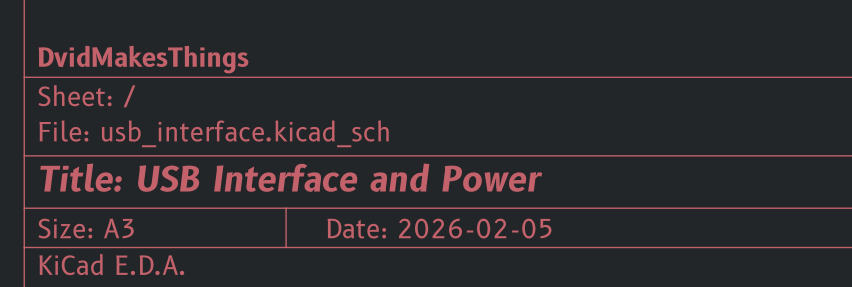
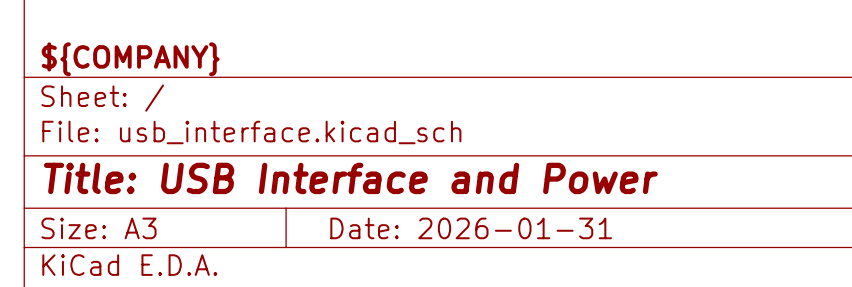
title block: DvidMakesThings (143, 59) -> ${COMPANY} (130, 59)
title block: Date: 2026-02-05 (439, 228) -> Date: 2026-01-31 (471, 228)

